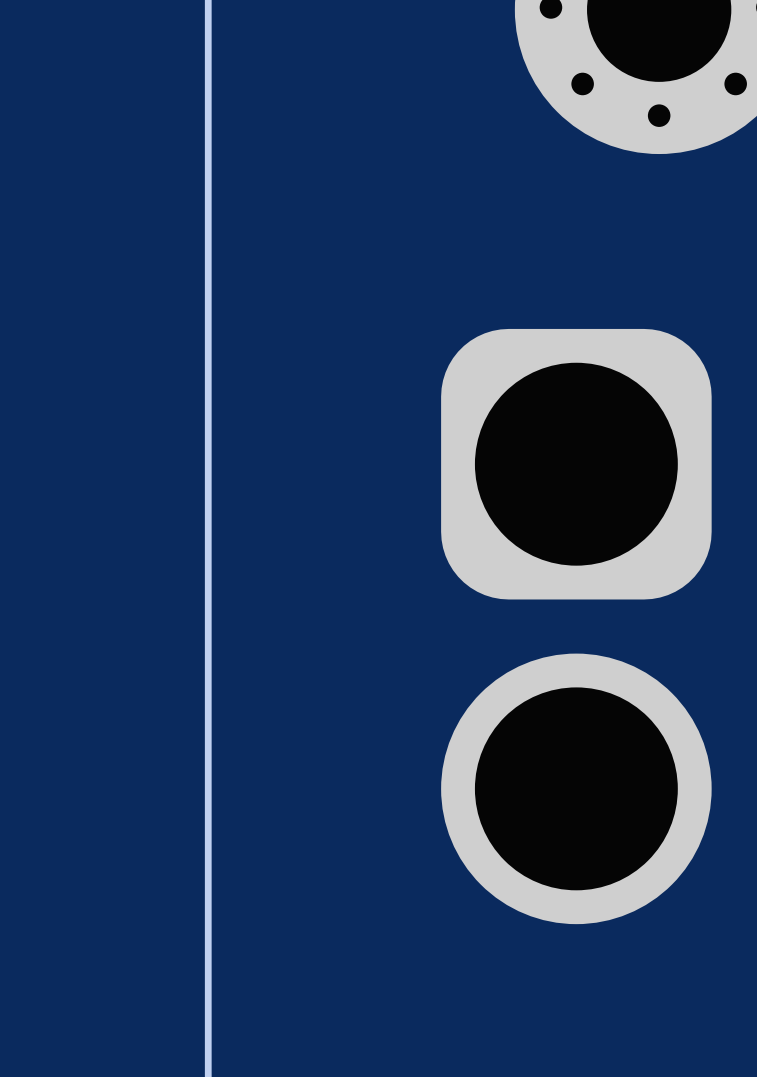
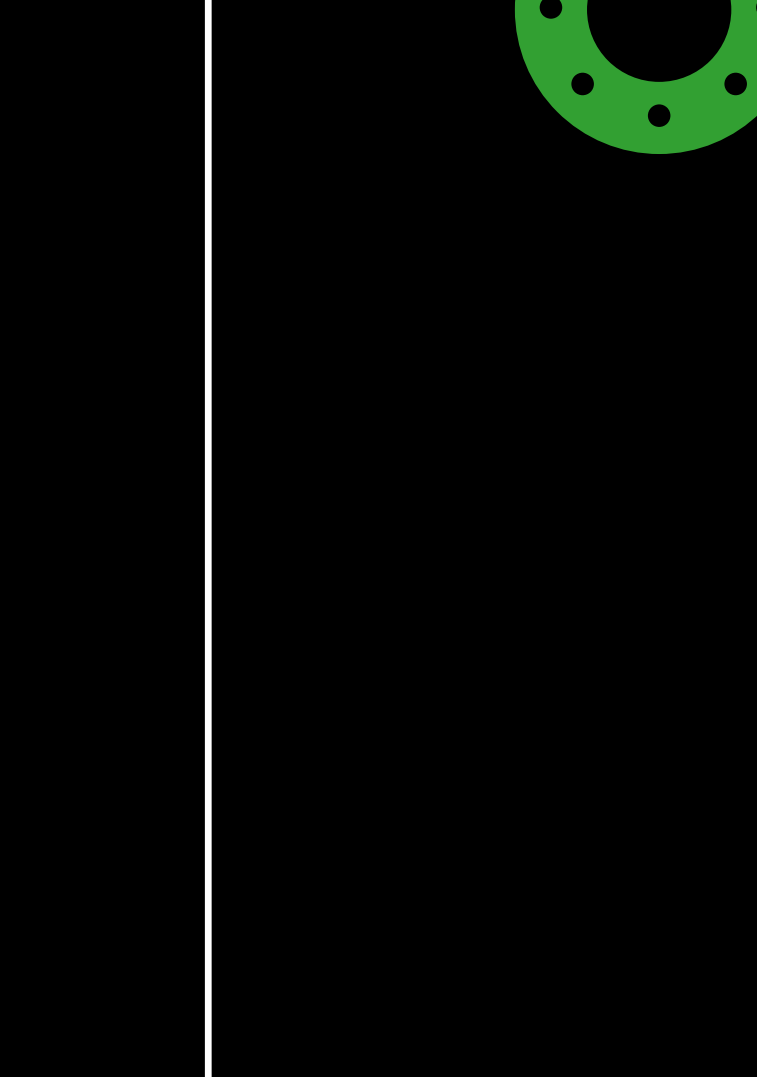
part: (576, 626) -> none

